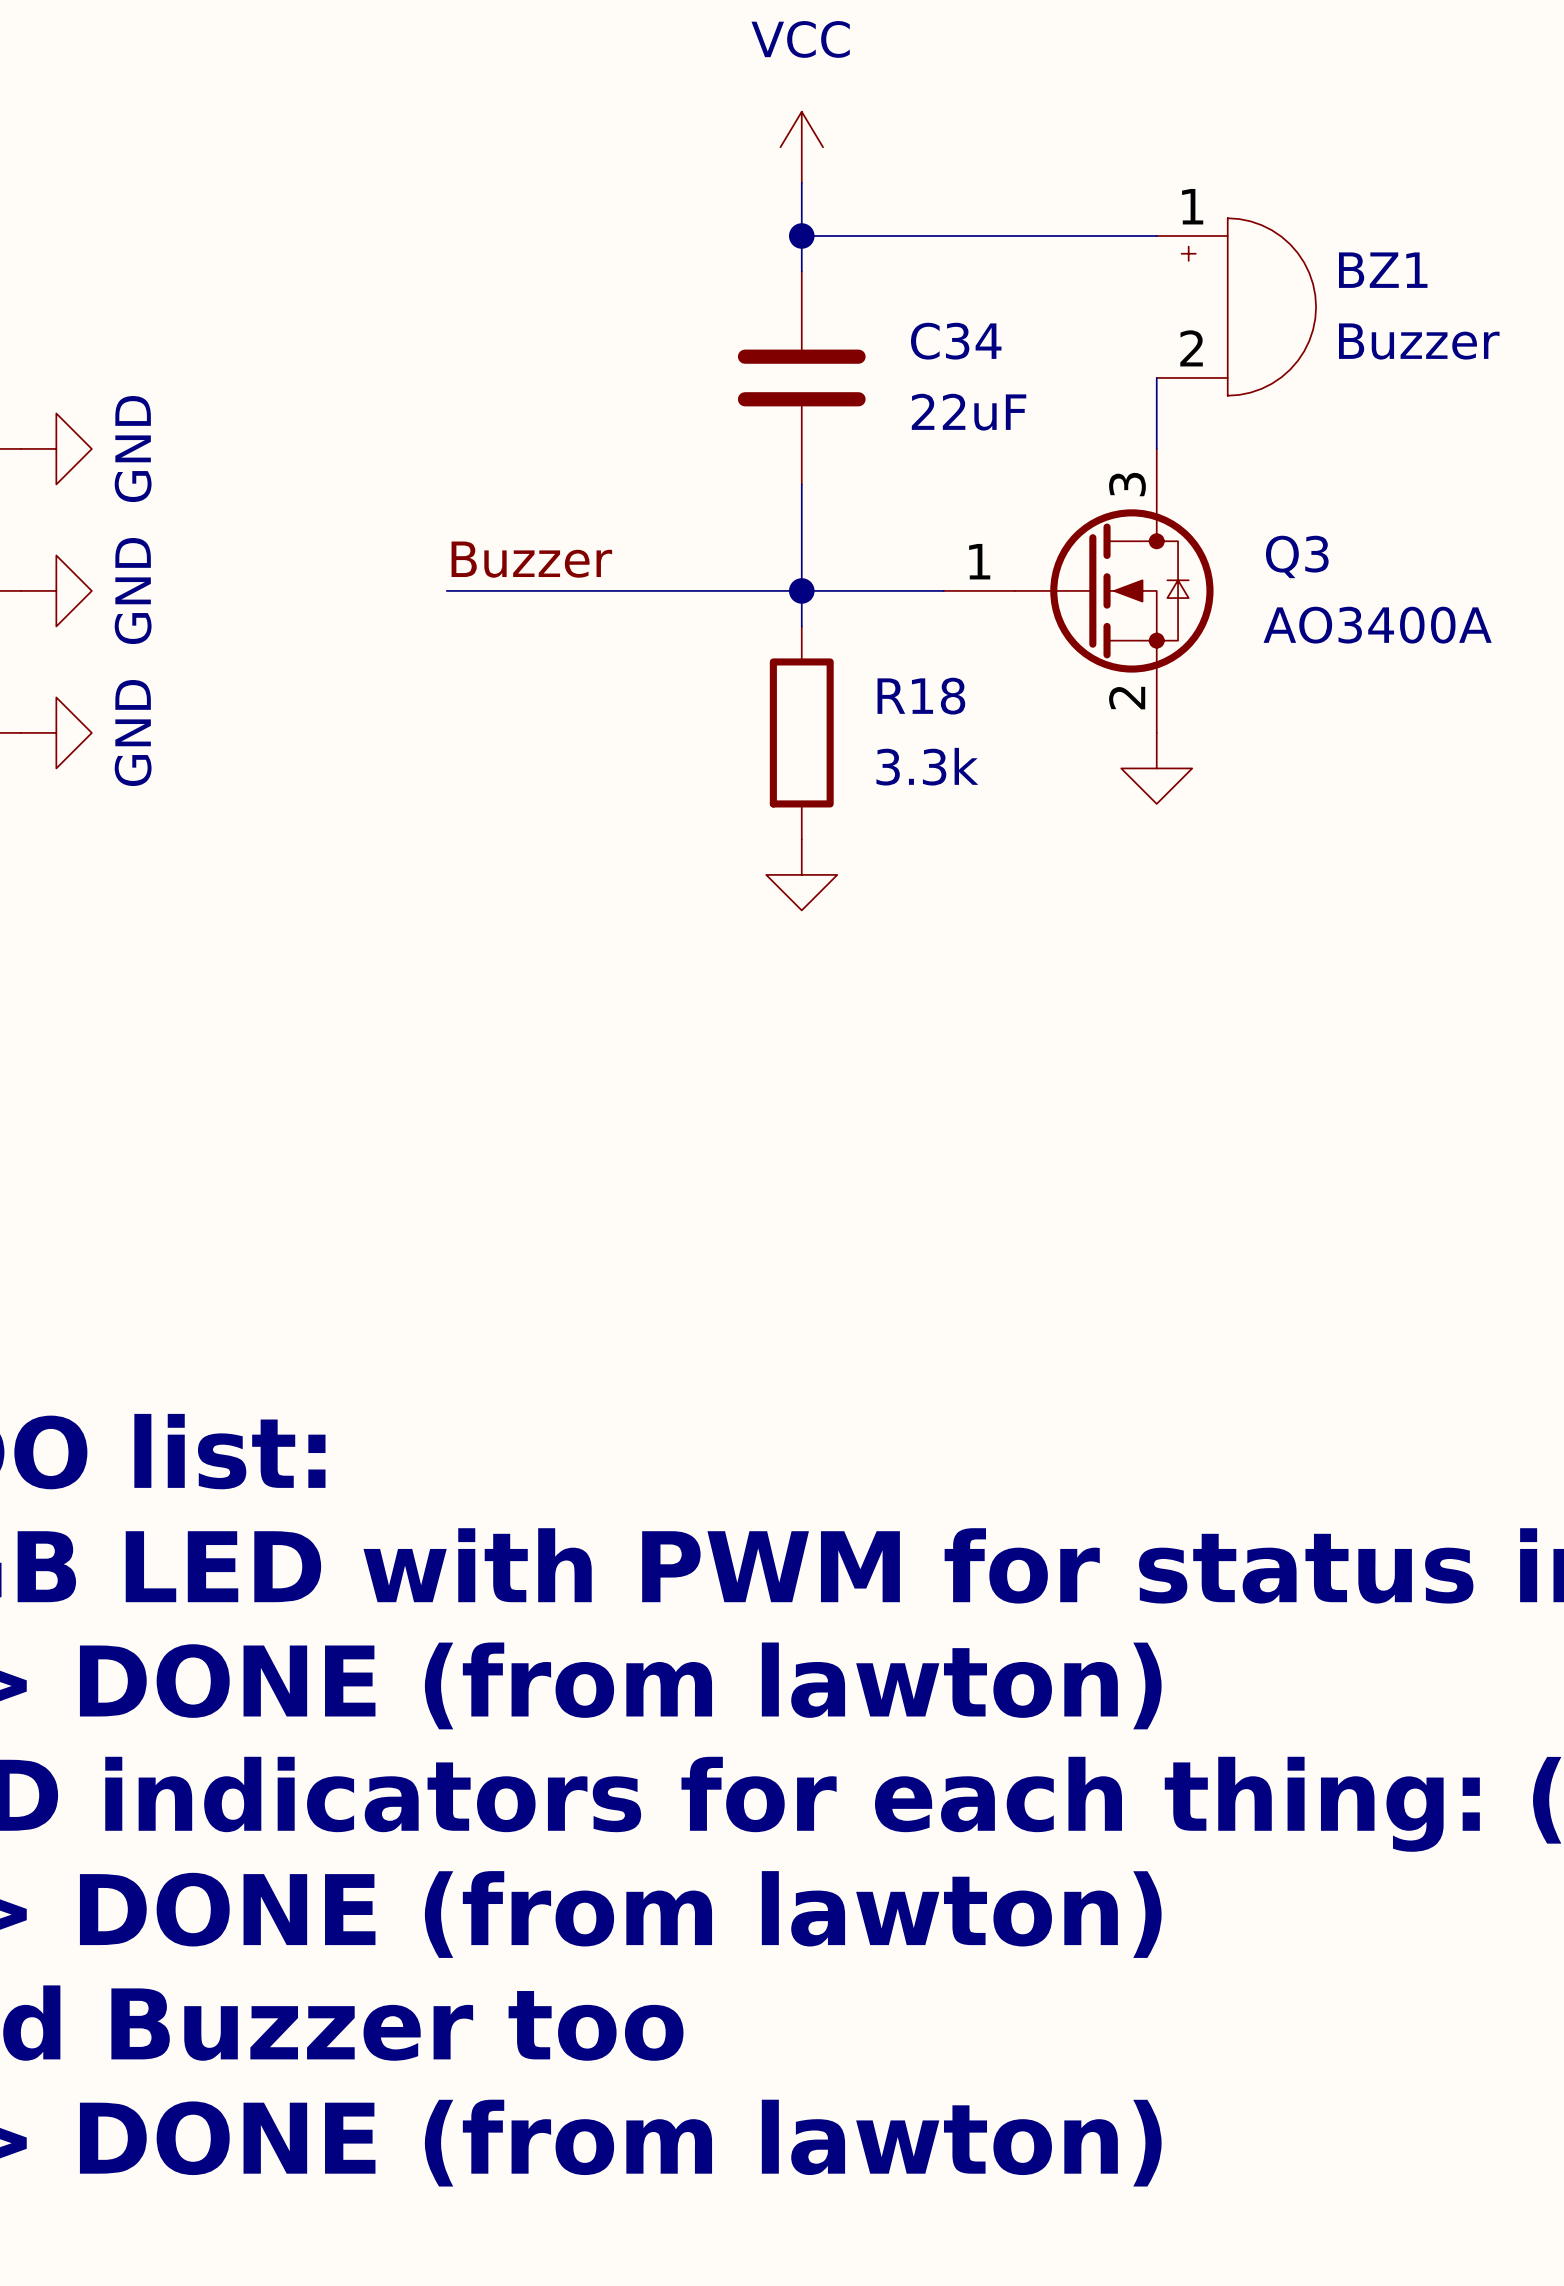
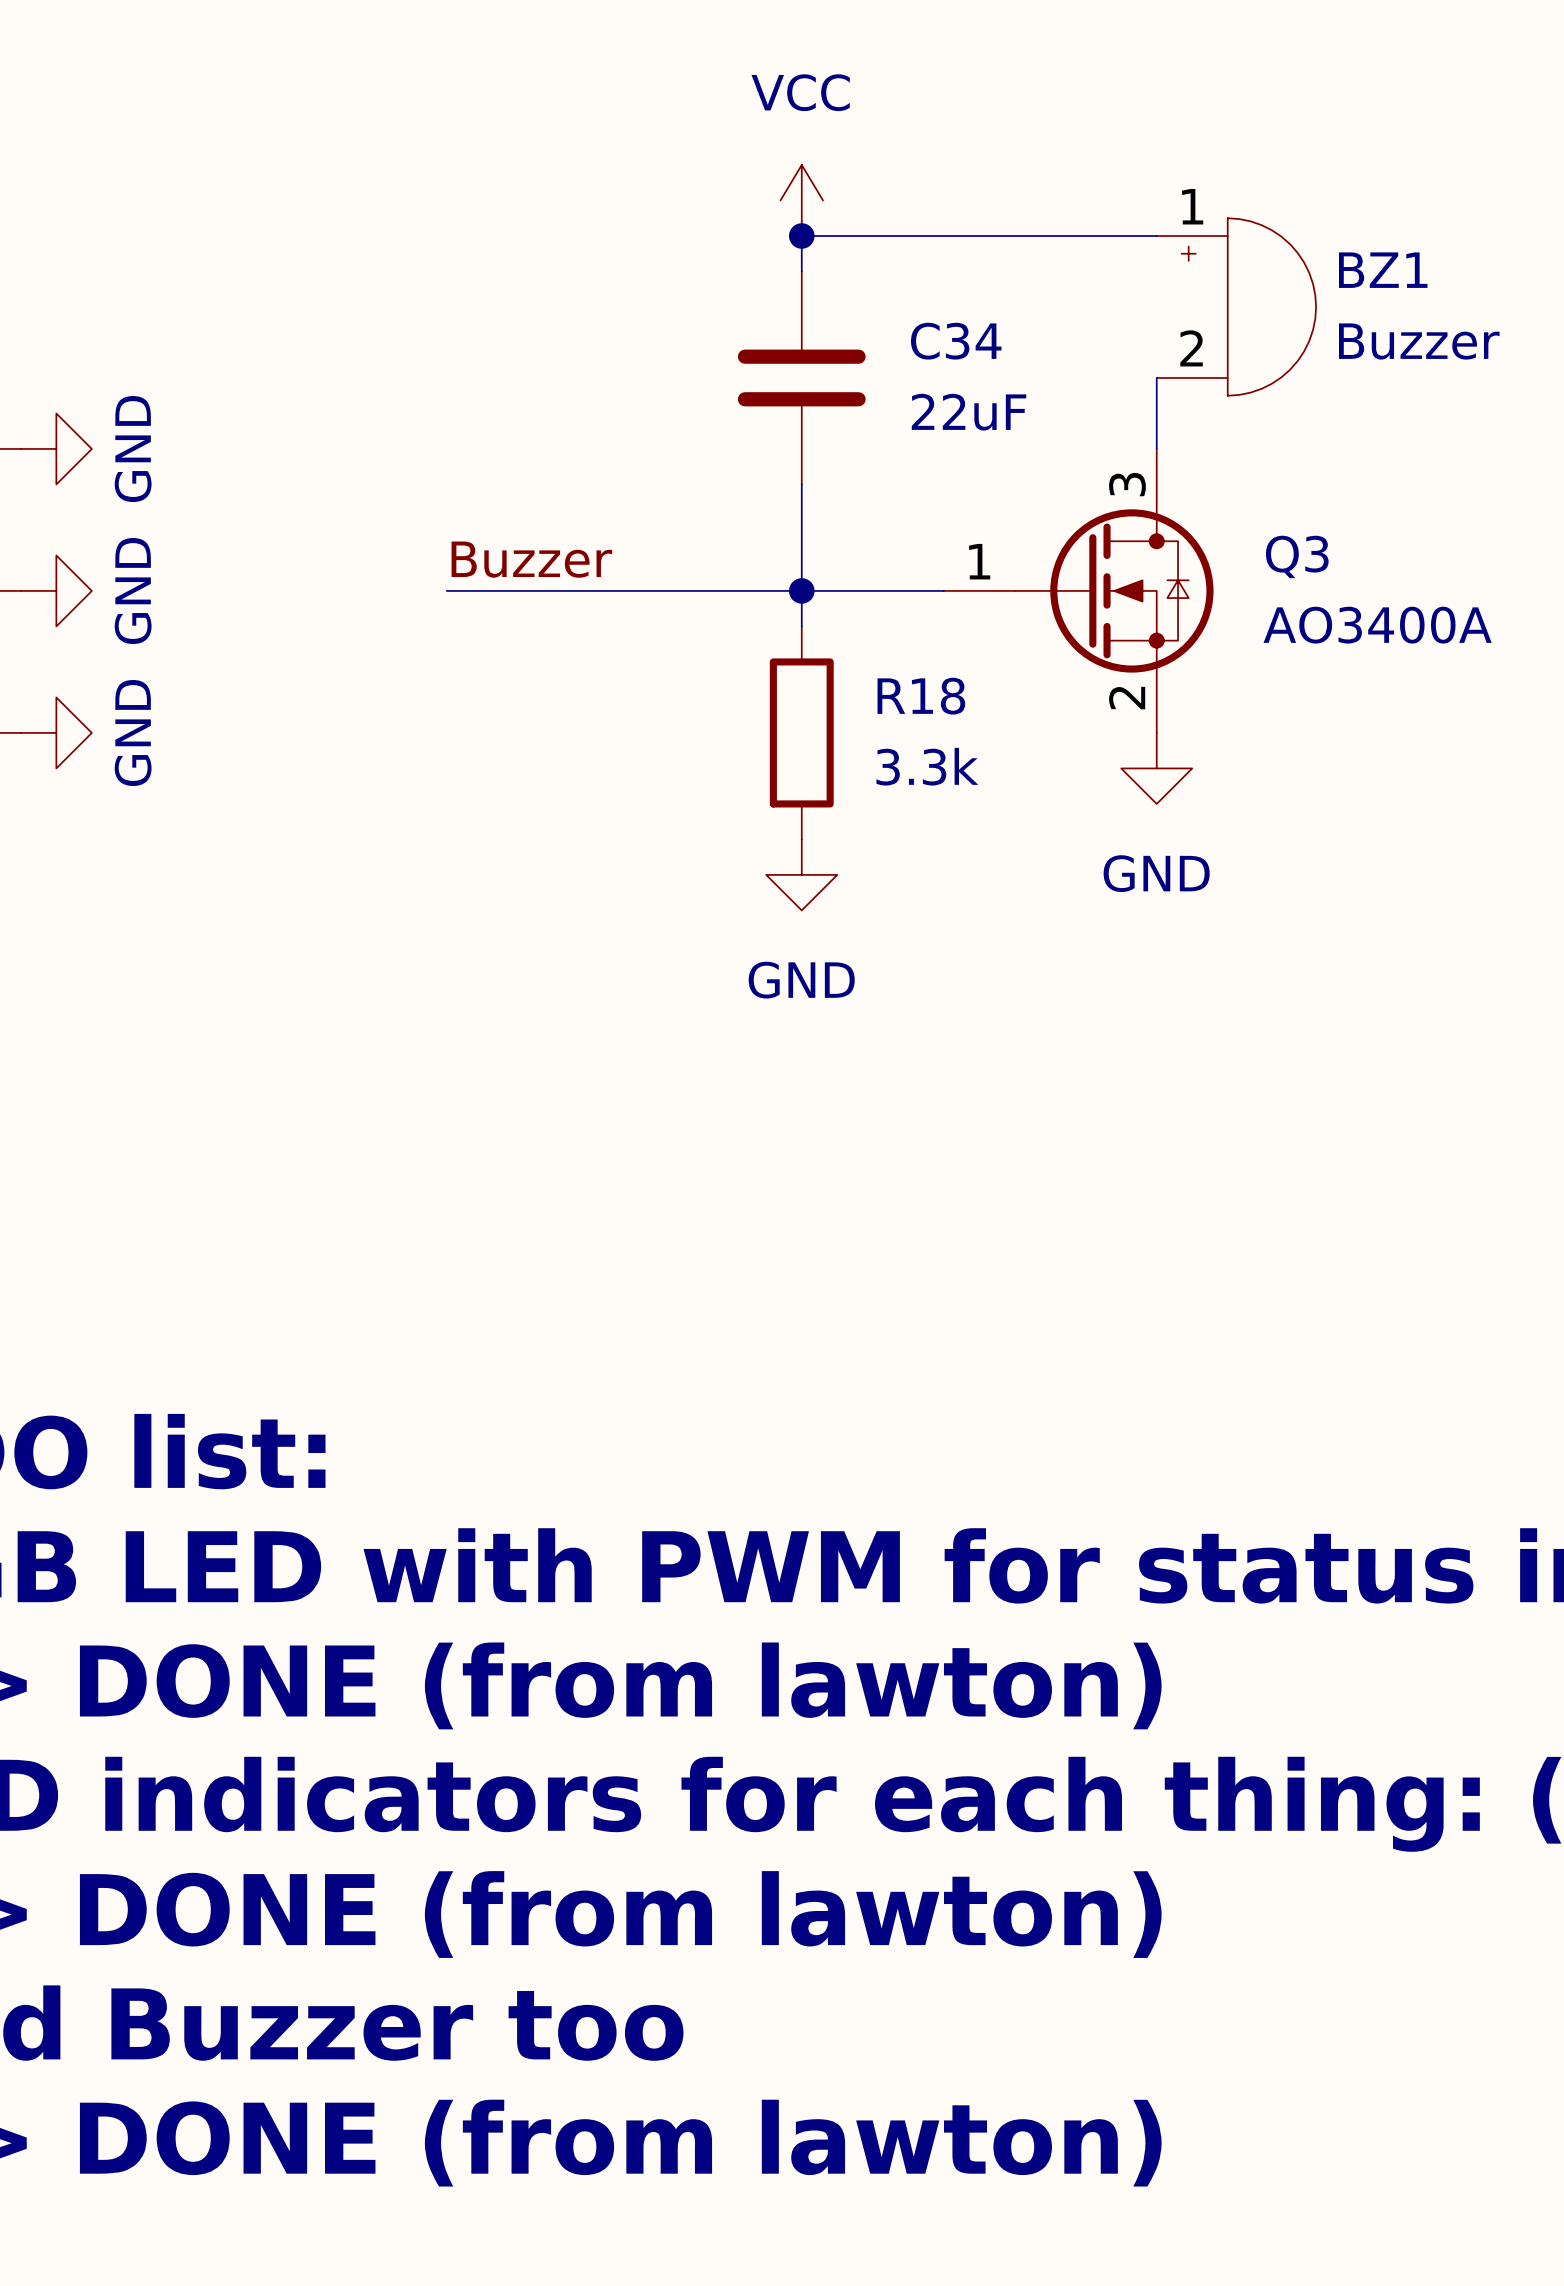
power symbol position: VCC (801, 147) -> VCC (801, 200)
power symbol text: none -> GND (1156, 873)
power symbol text: none -> GND (801, 980)

